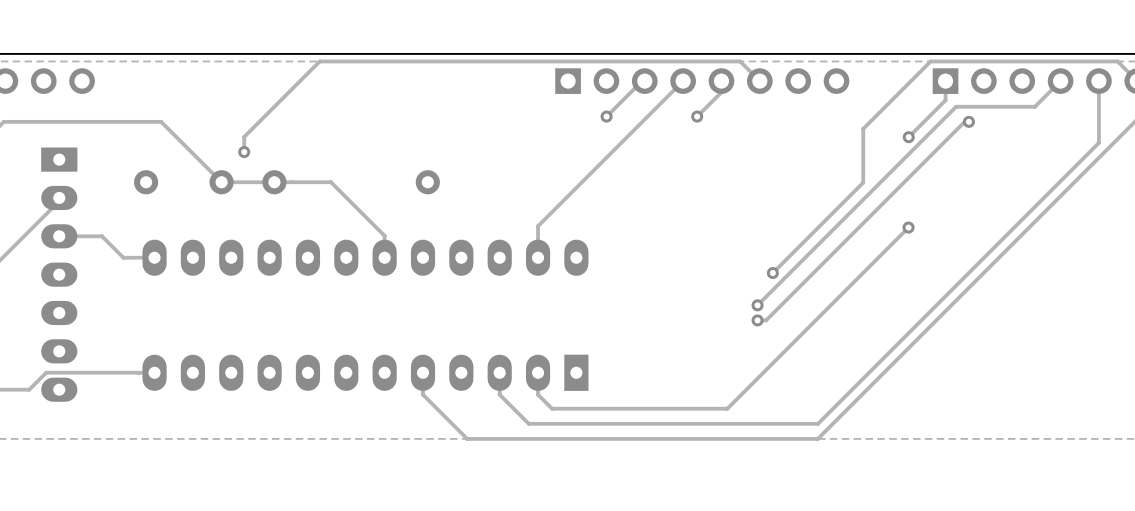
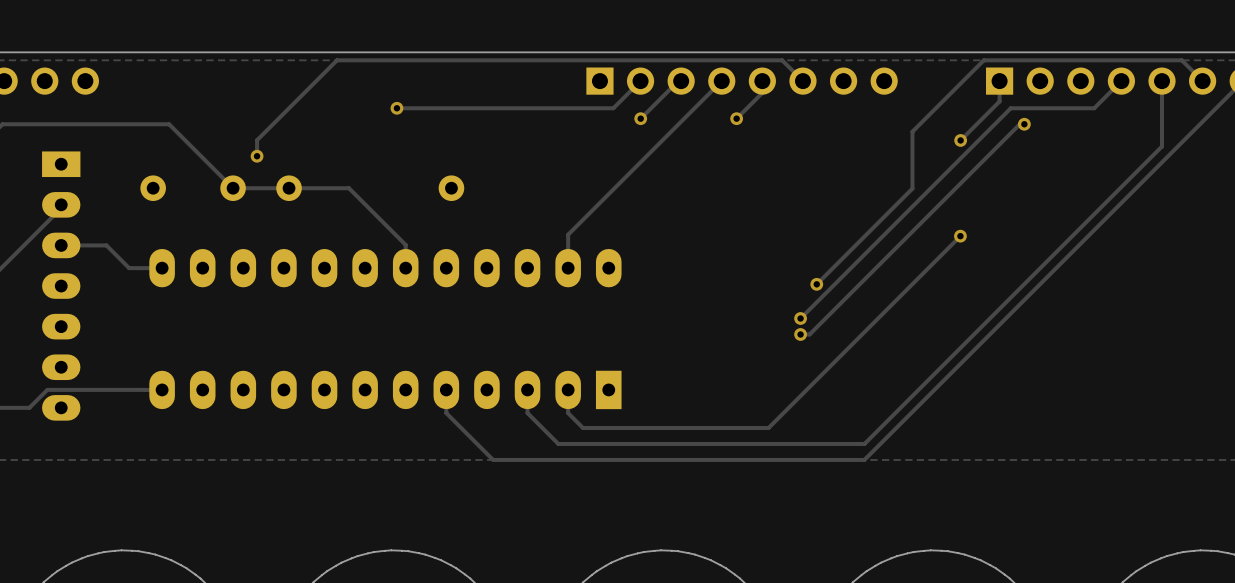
track: none -> (640, 81) (613, 108) (396, 108)
via: none -> (396, 108)

